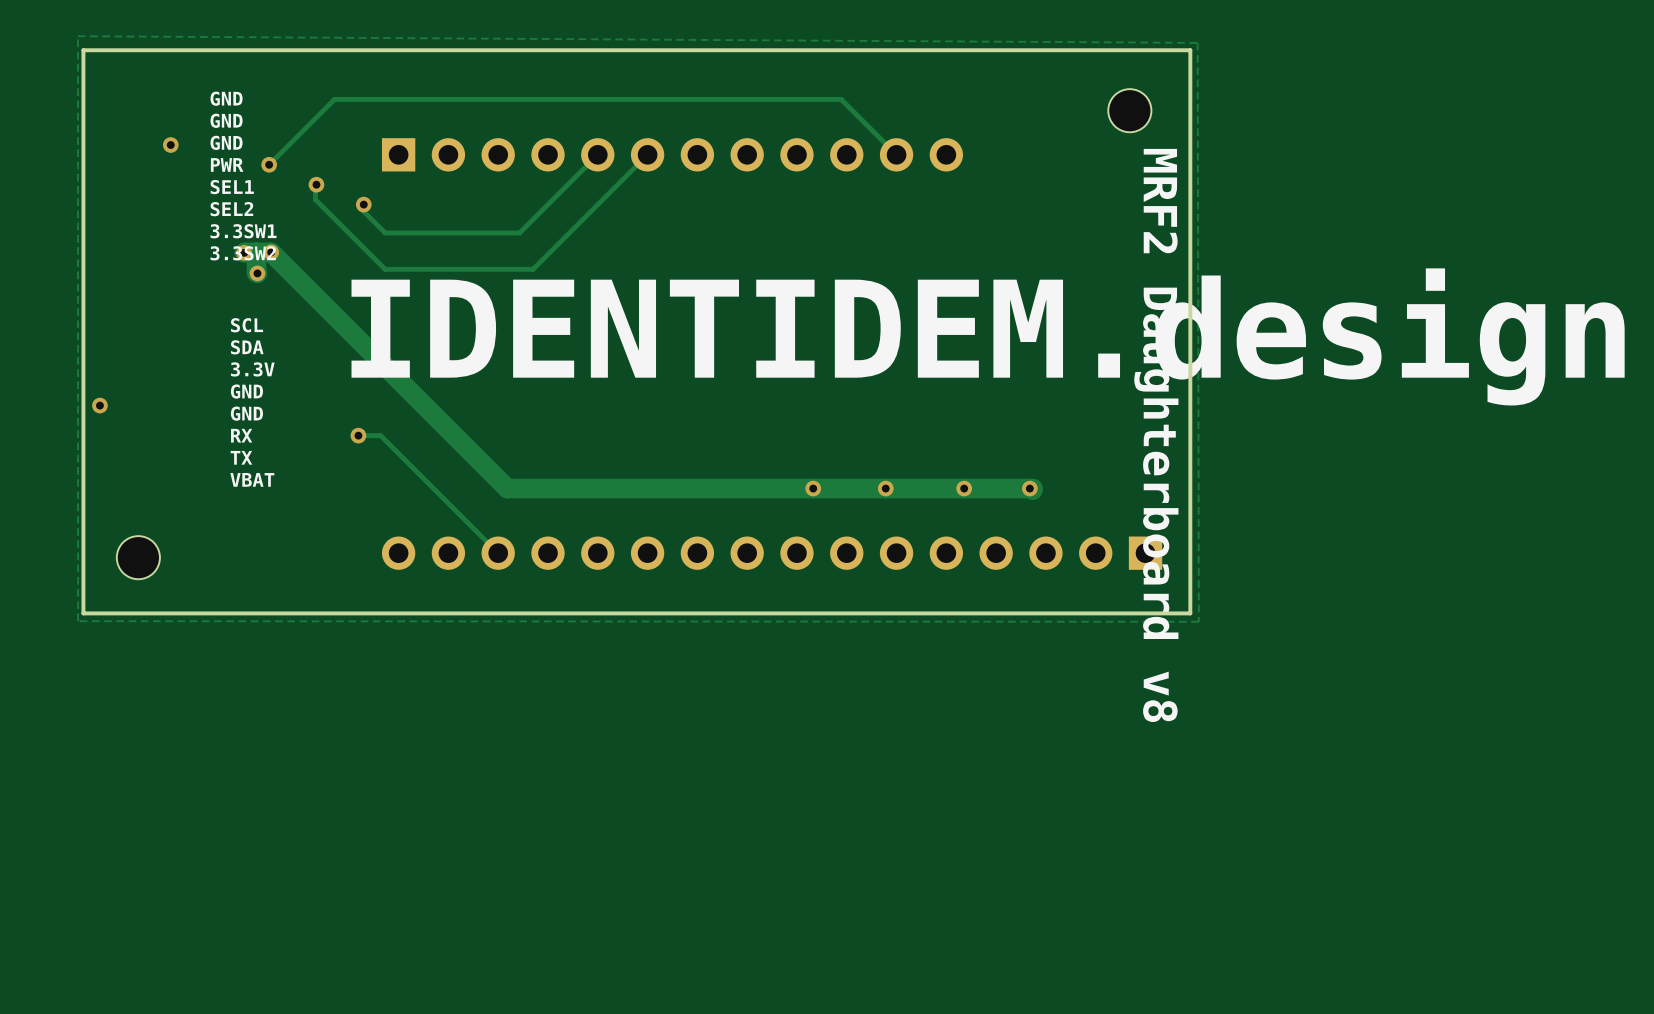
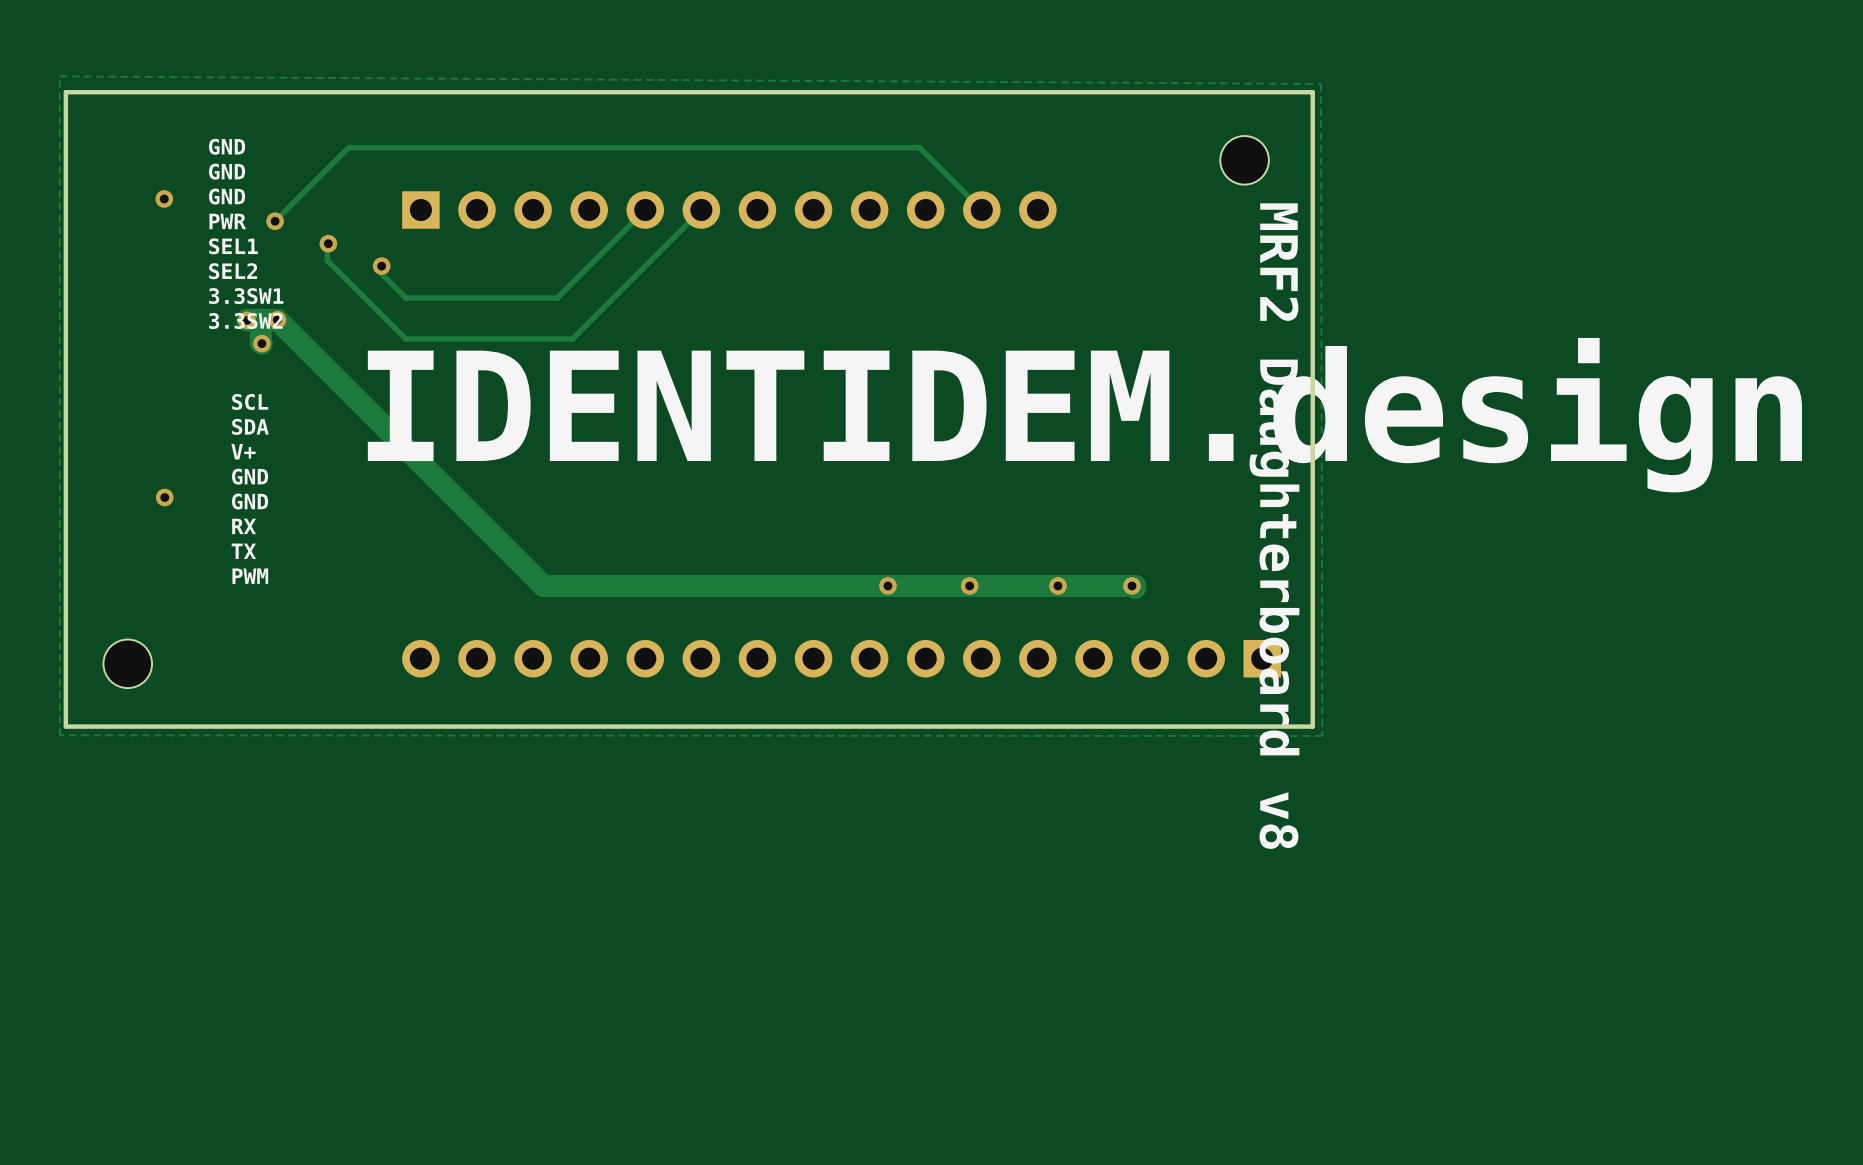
text: 3.3V (252, 369) -> V+ (243, 451)
via position: (99, 405) -> (164, 497)
track: (358, 435) (380, 435) (498, 553) -> none
via: (358, 435) -> none
text: VBAT (252, 479) -> PWM (250, 576)

